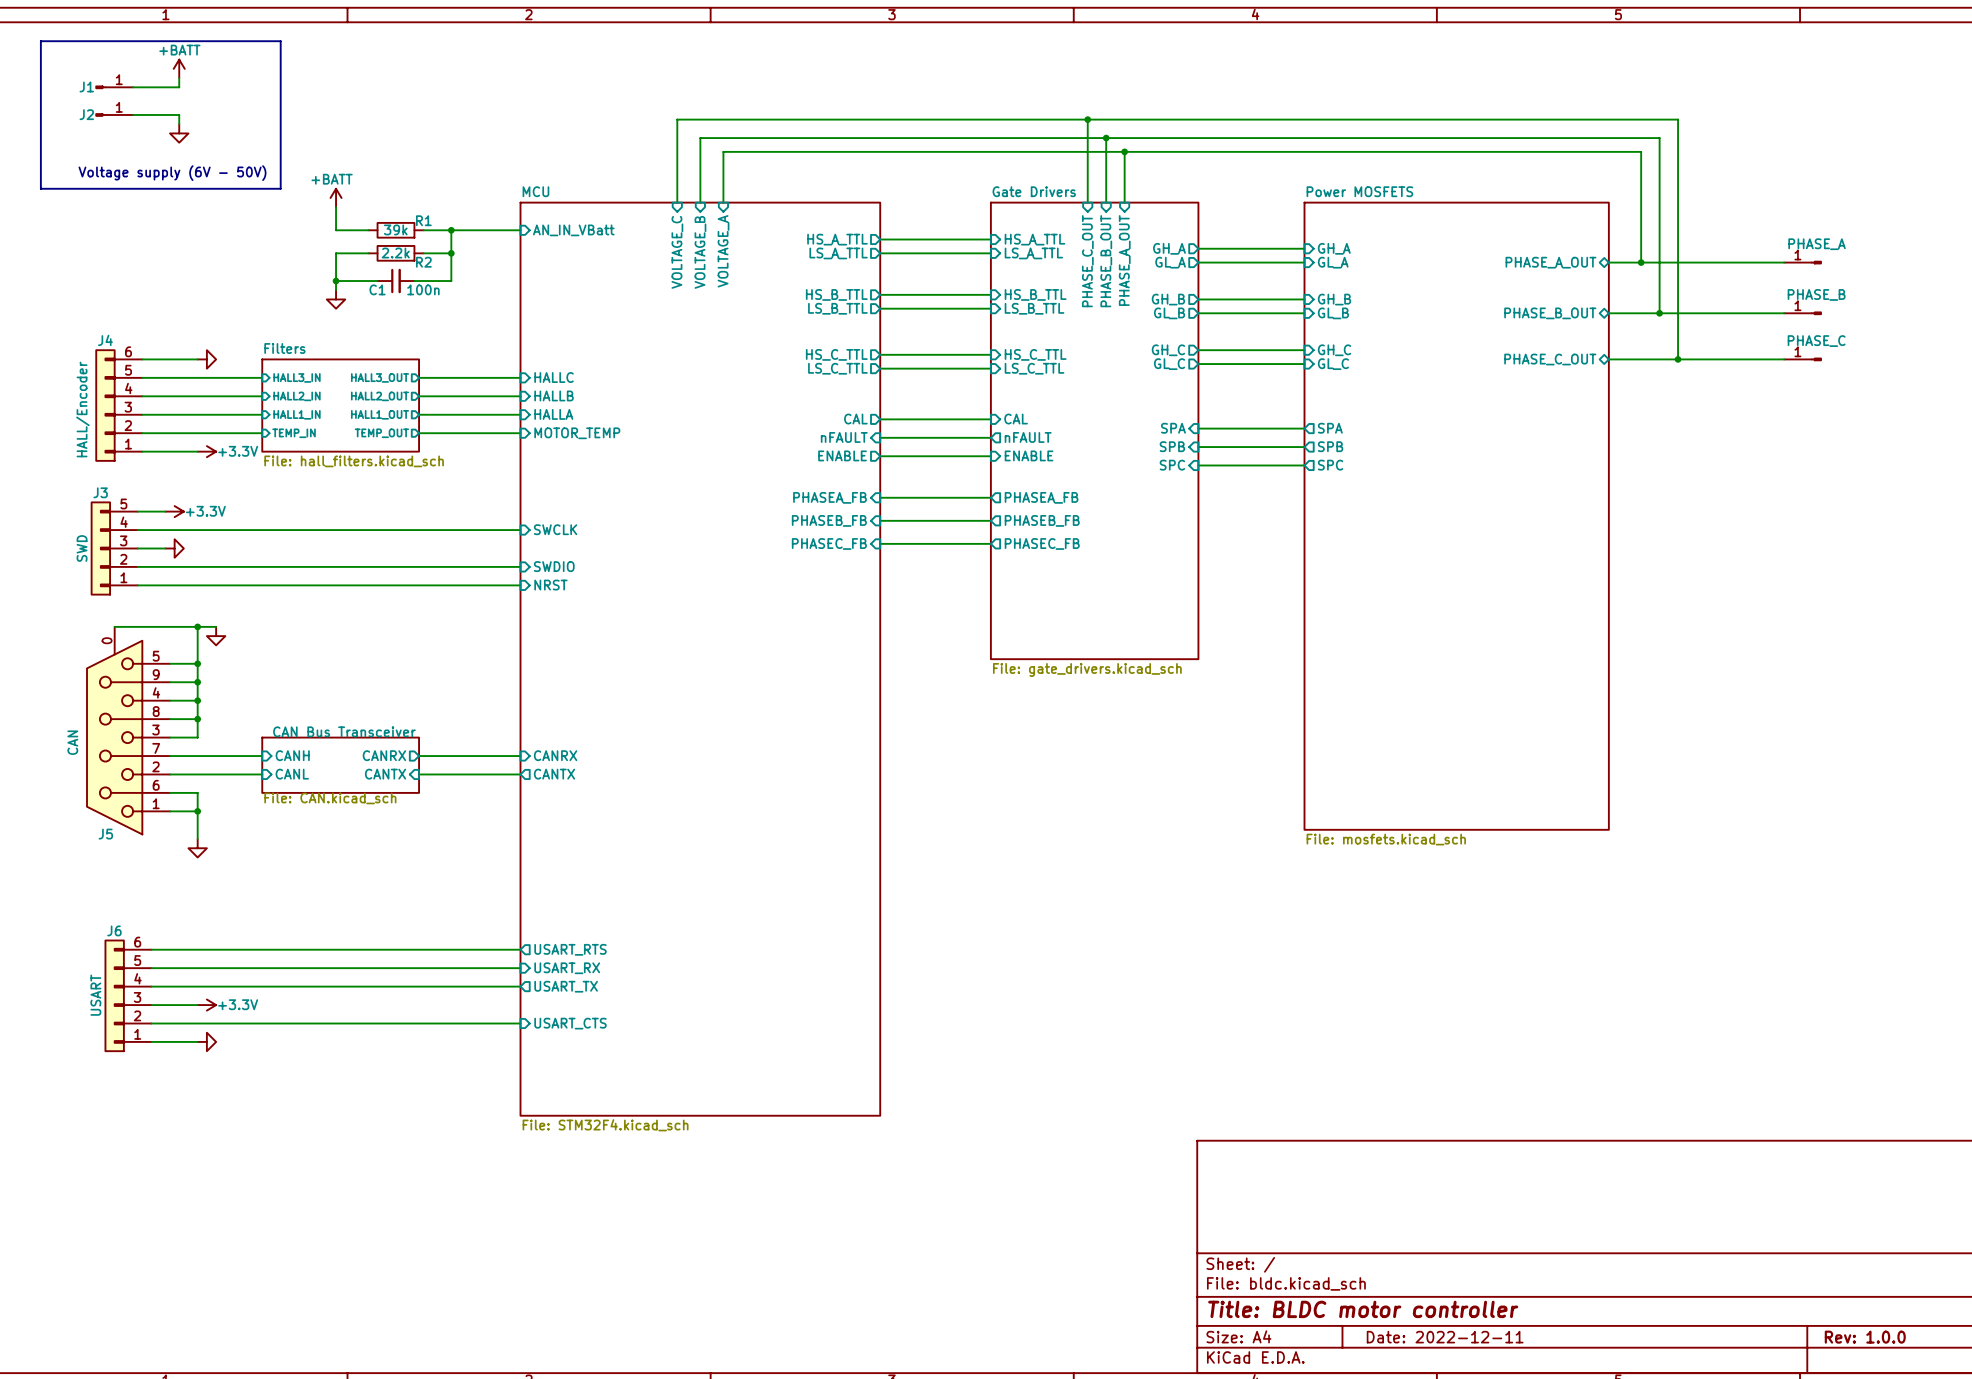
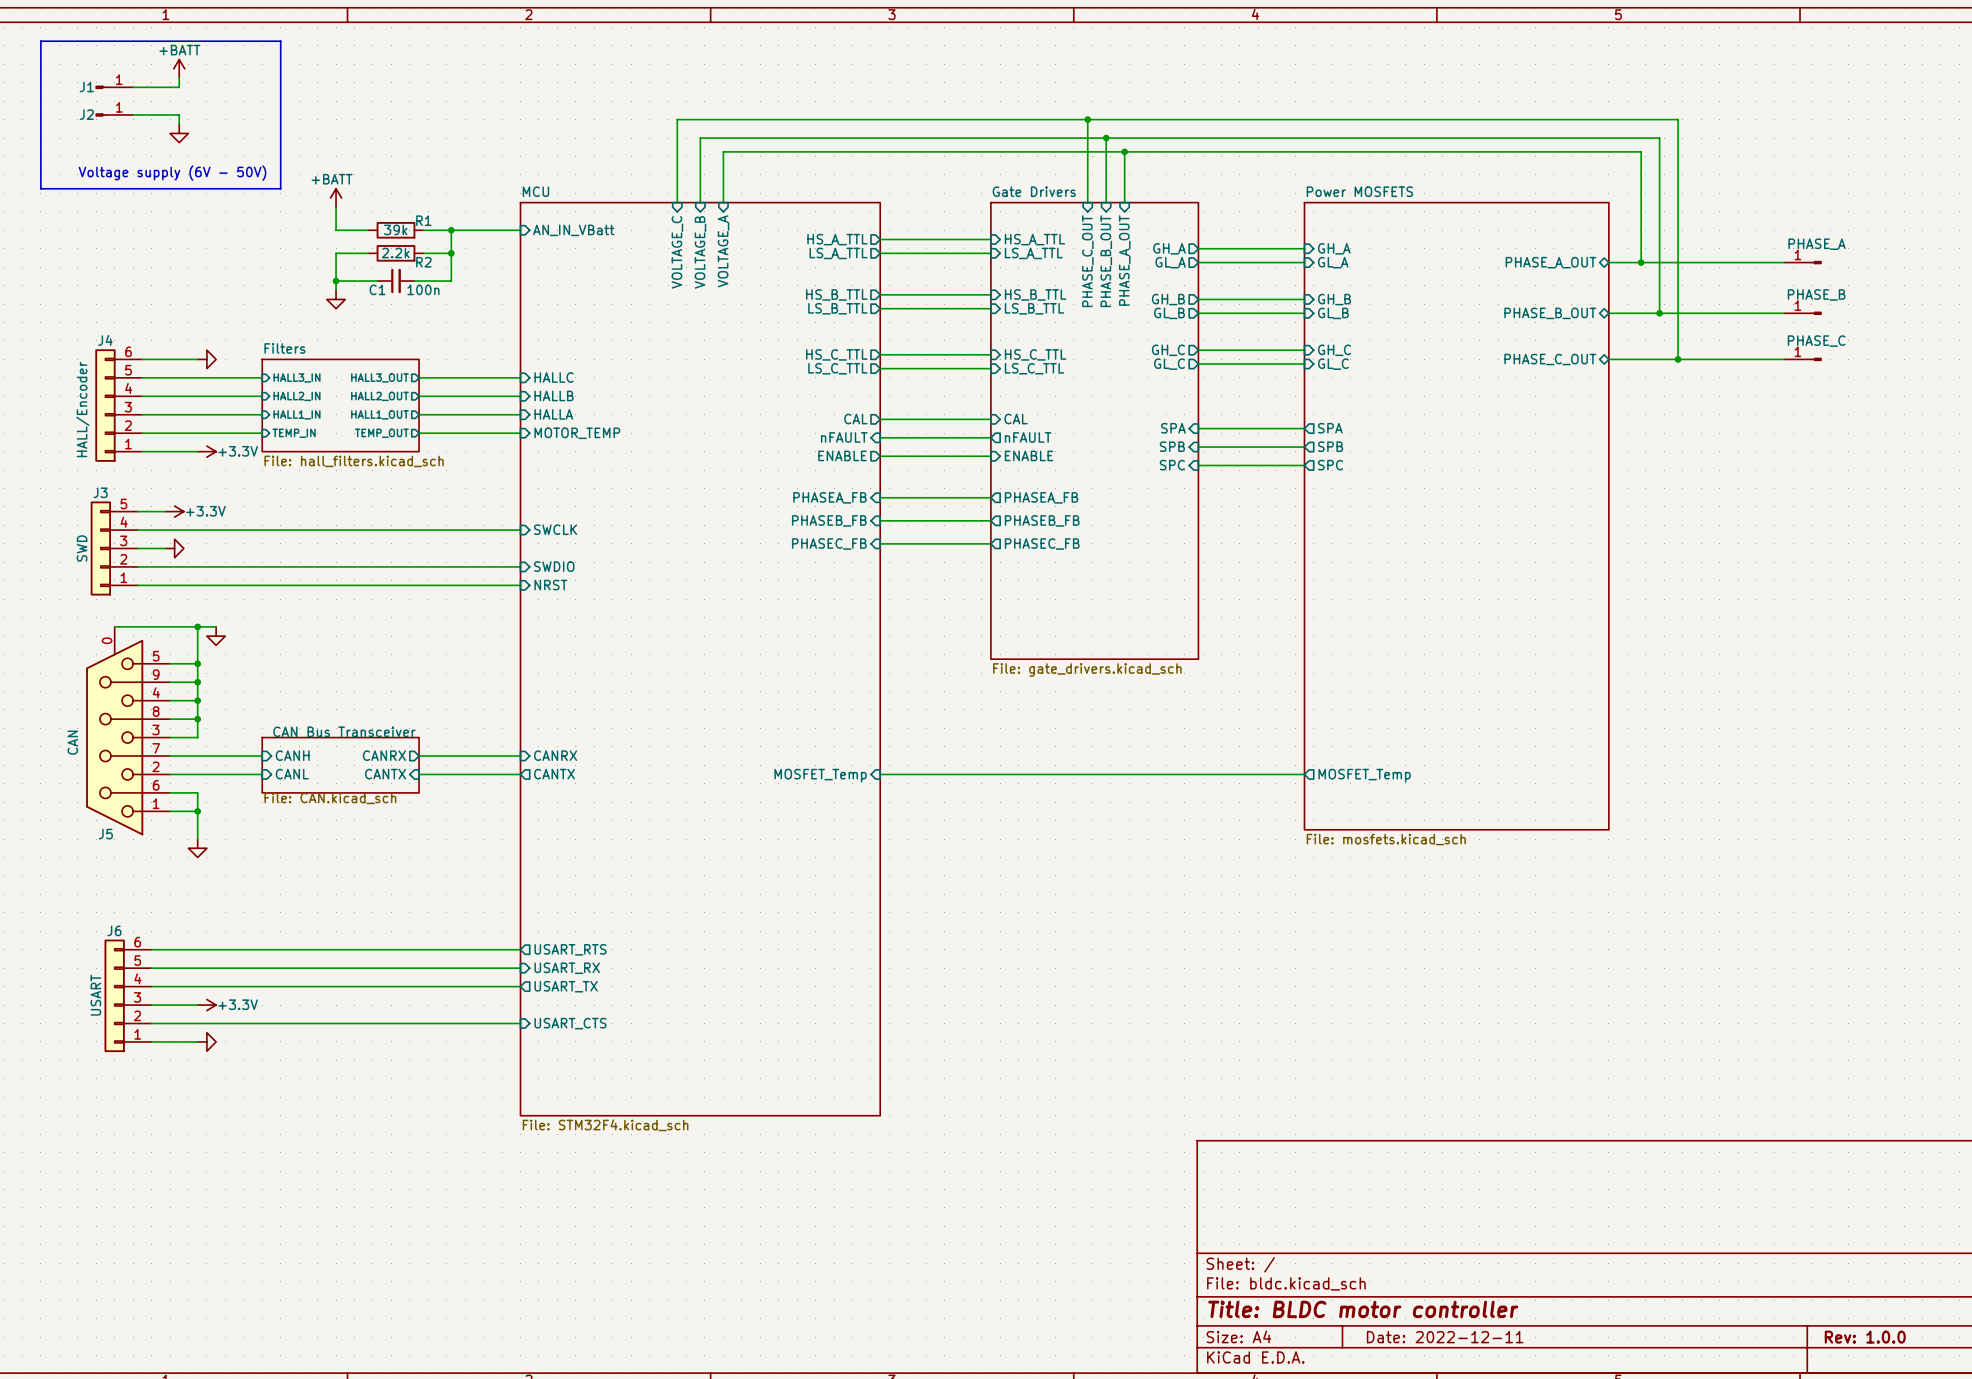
wire: none -> (880, 774) (1304, 774)
sheet pin: none -> MOSFET_Temp (820, 775)
sheet pin: none -> MOSFET_Temp (1364, 775)

